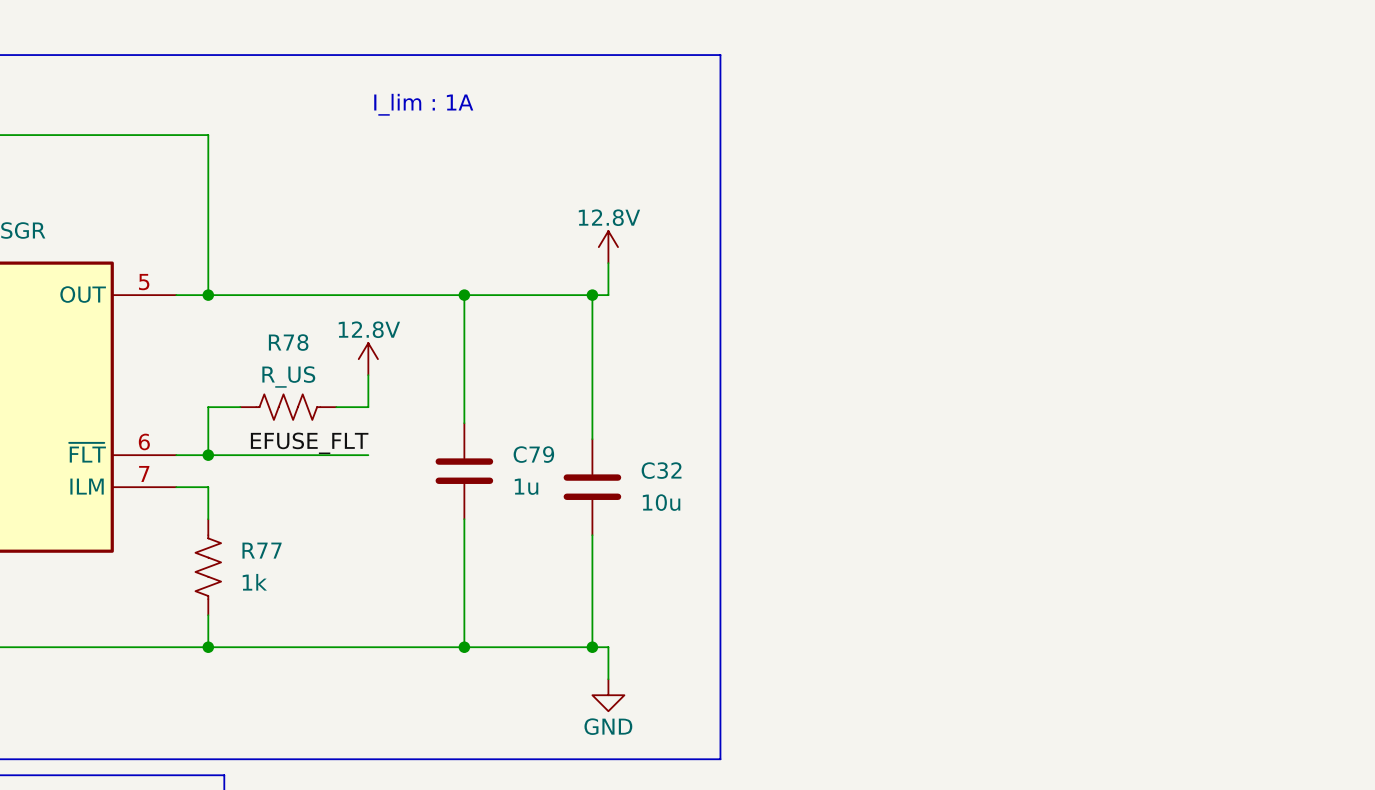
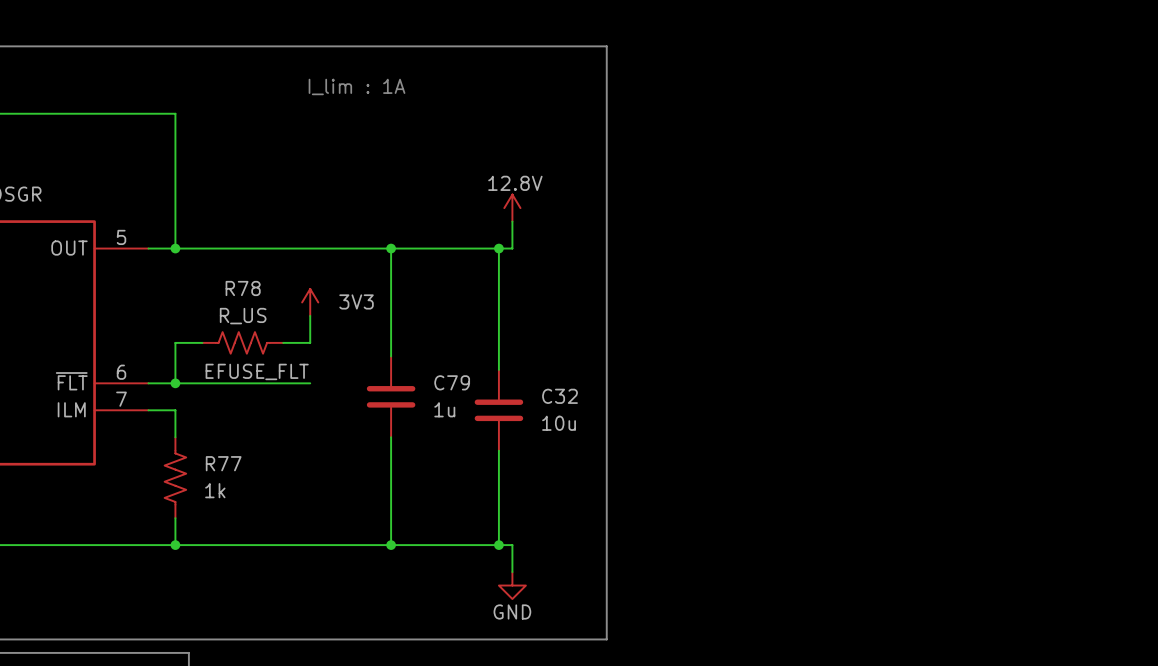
power symbol: 12.8V (368, 359) -> 3V3 (310, 302)

